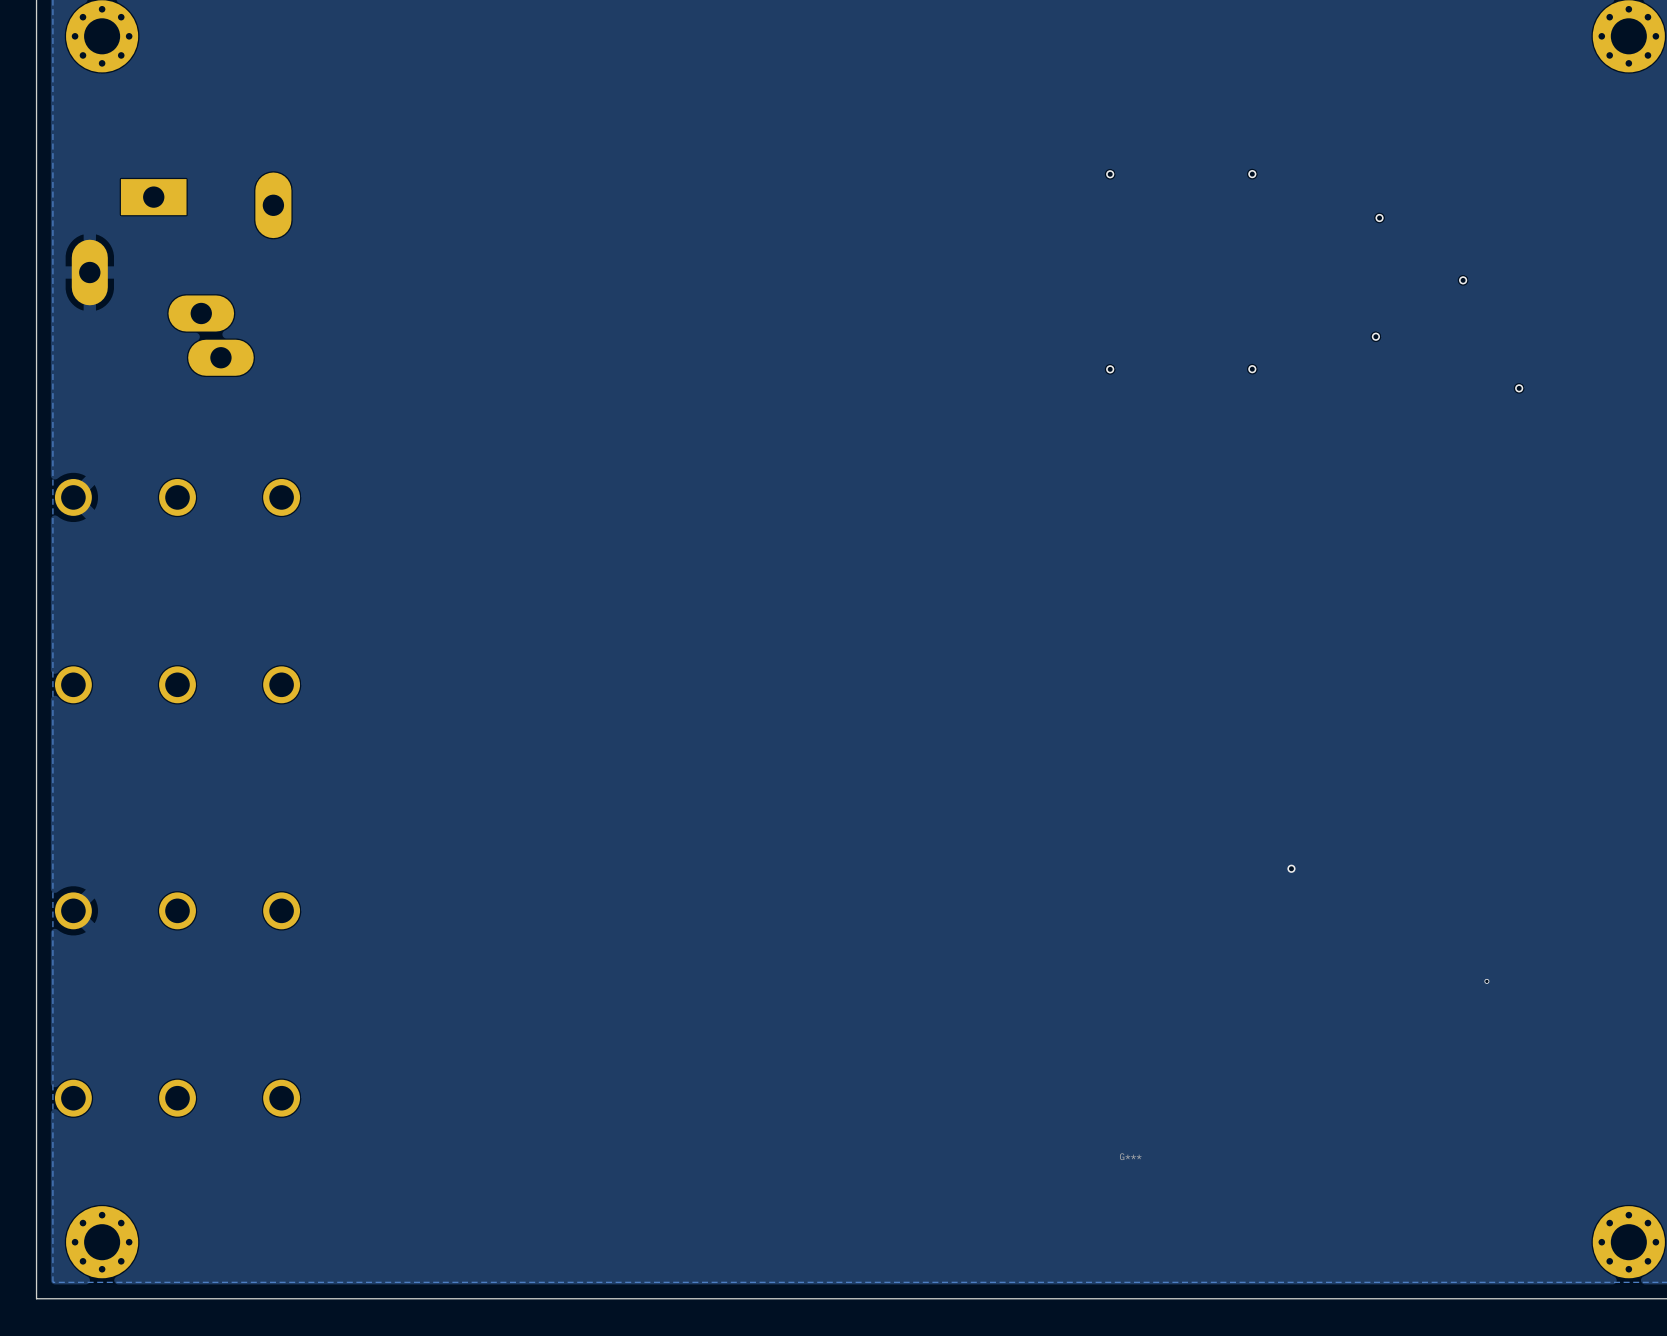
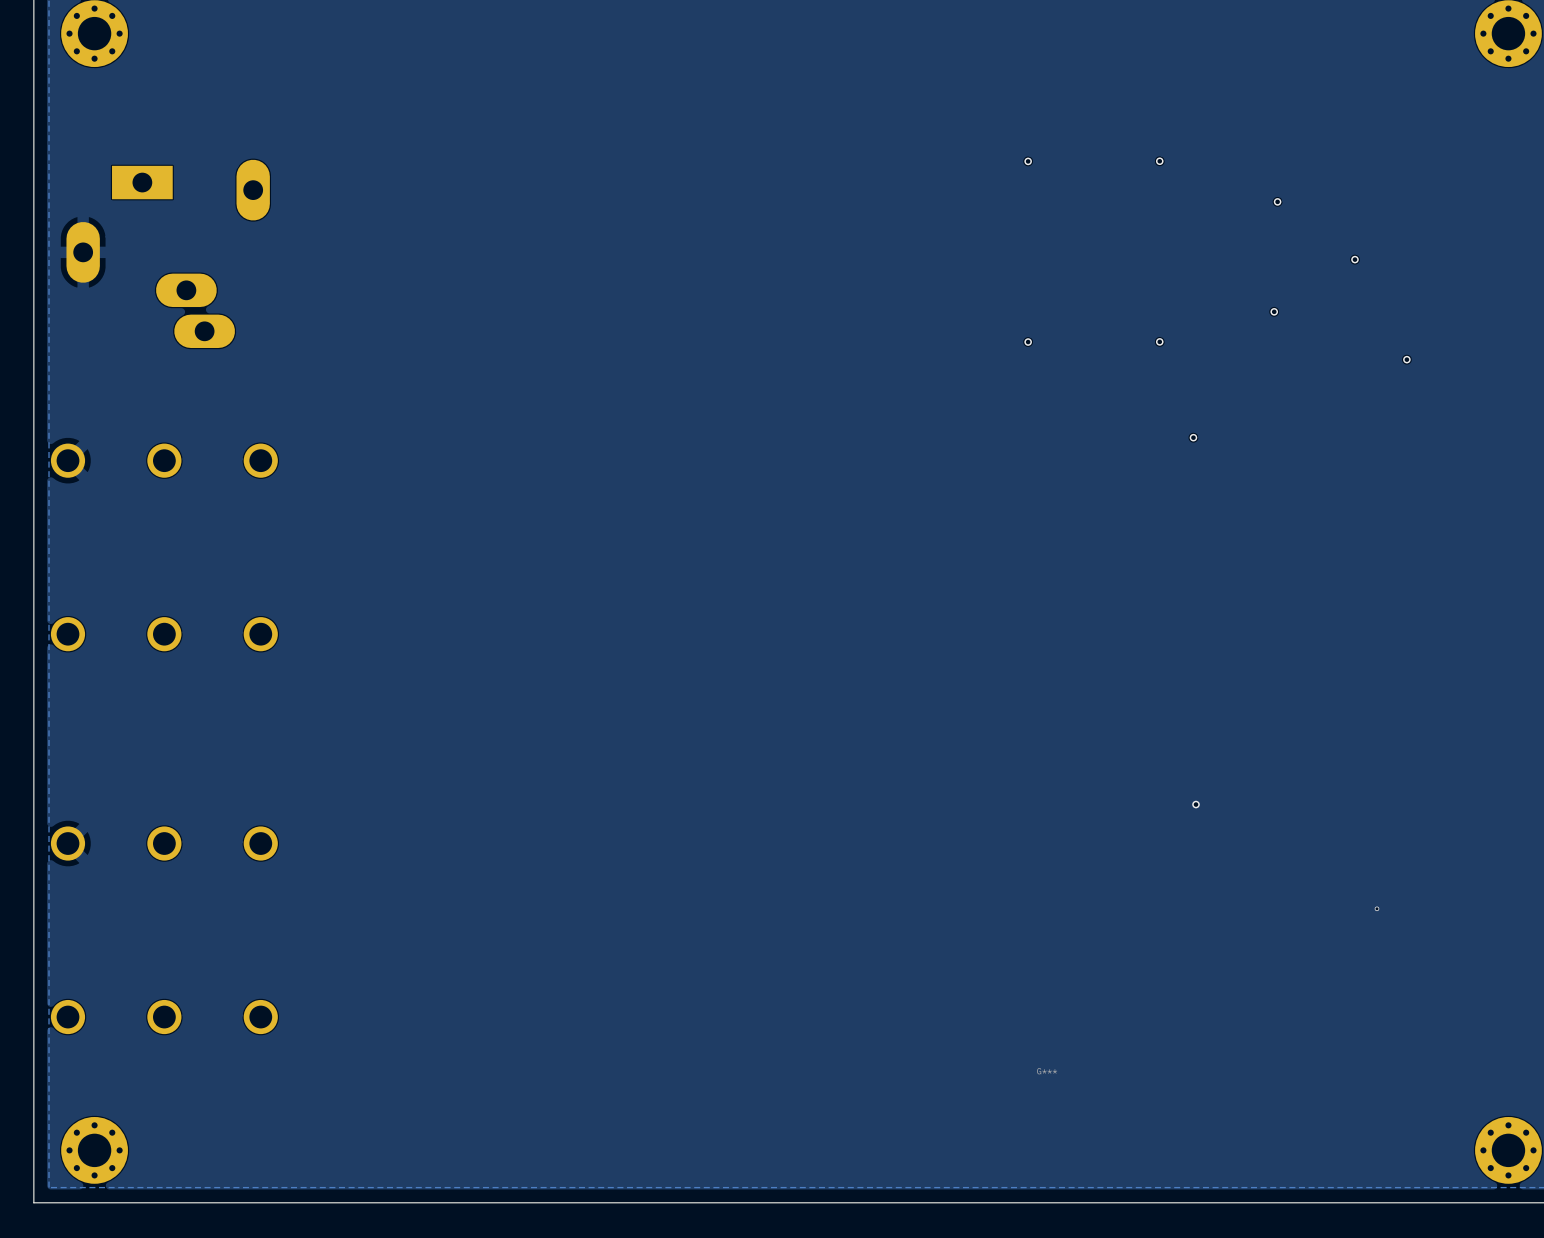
via: none -> (1193, 437)

